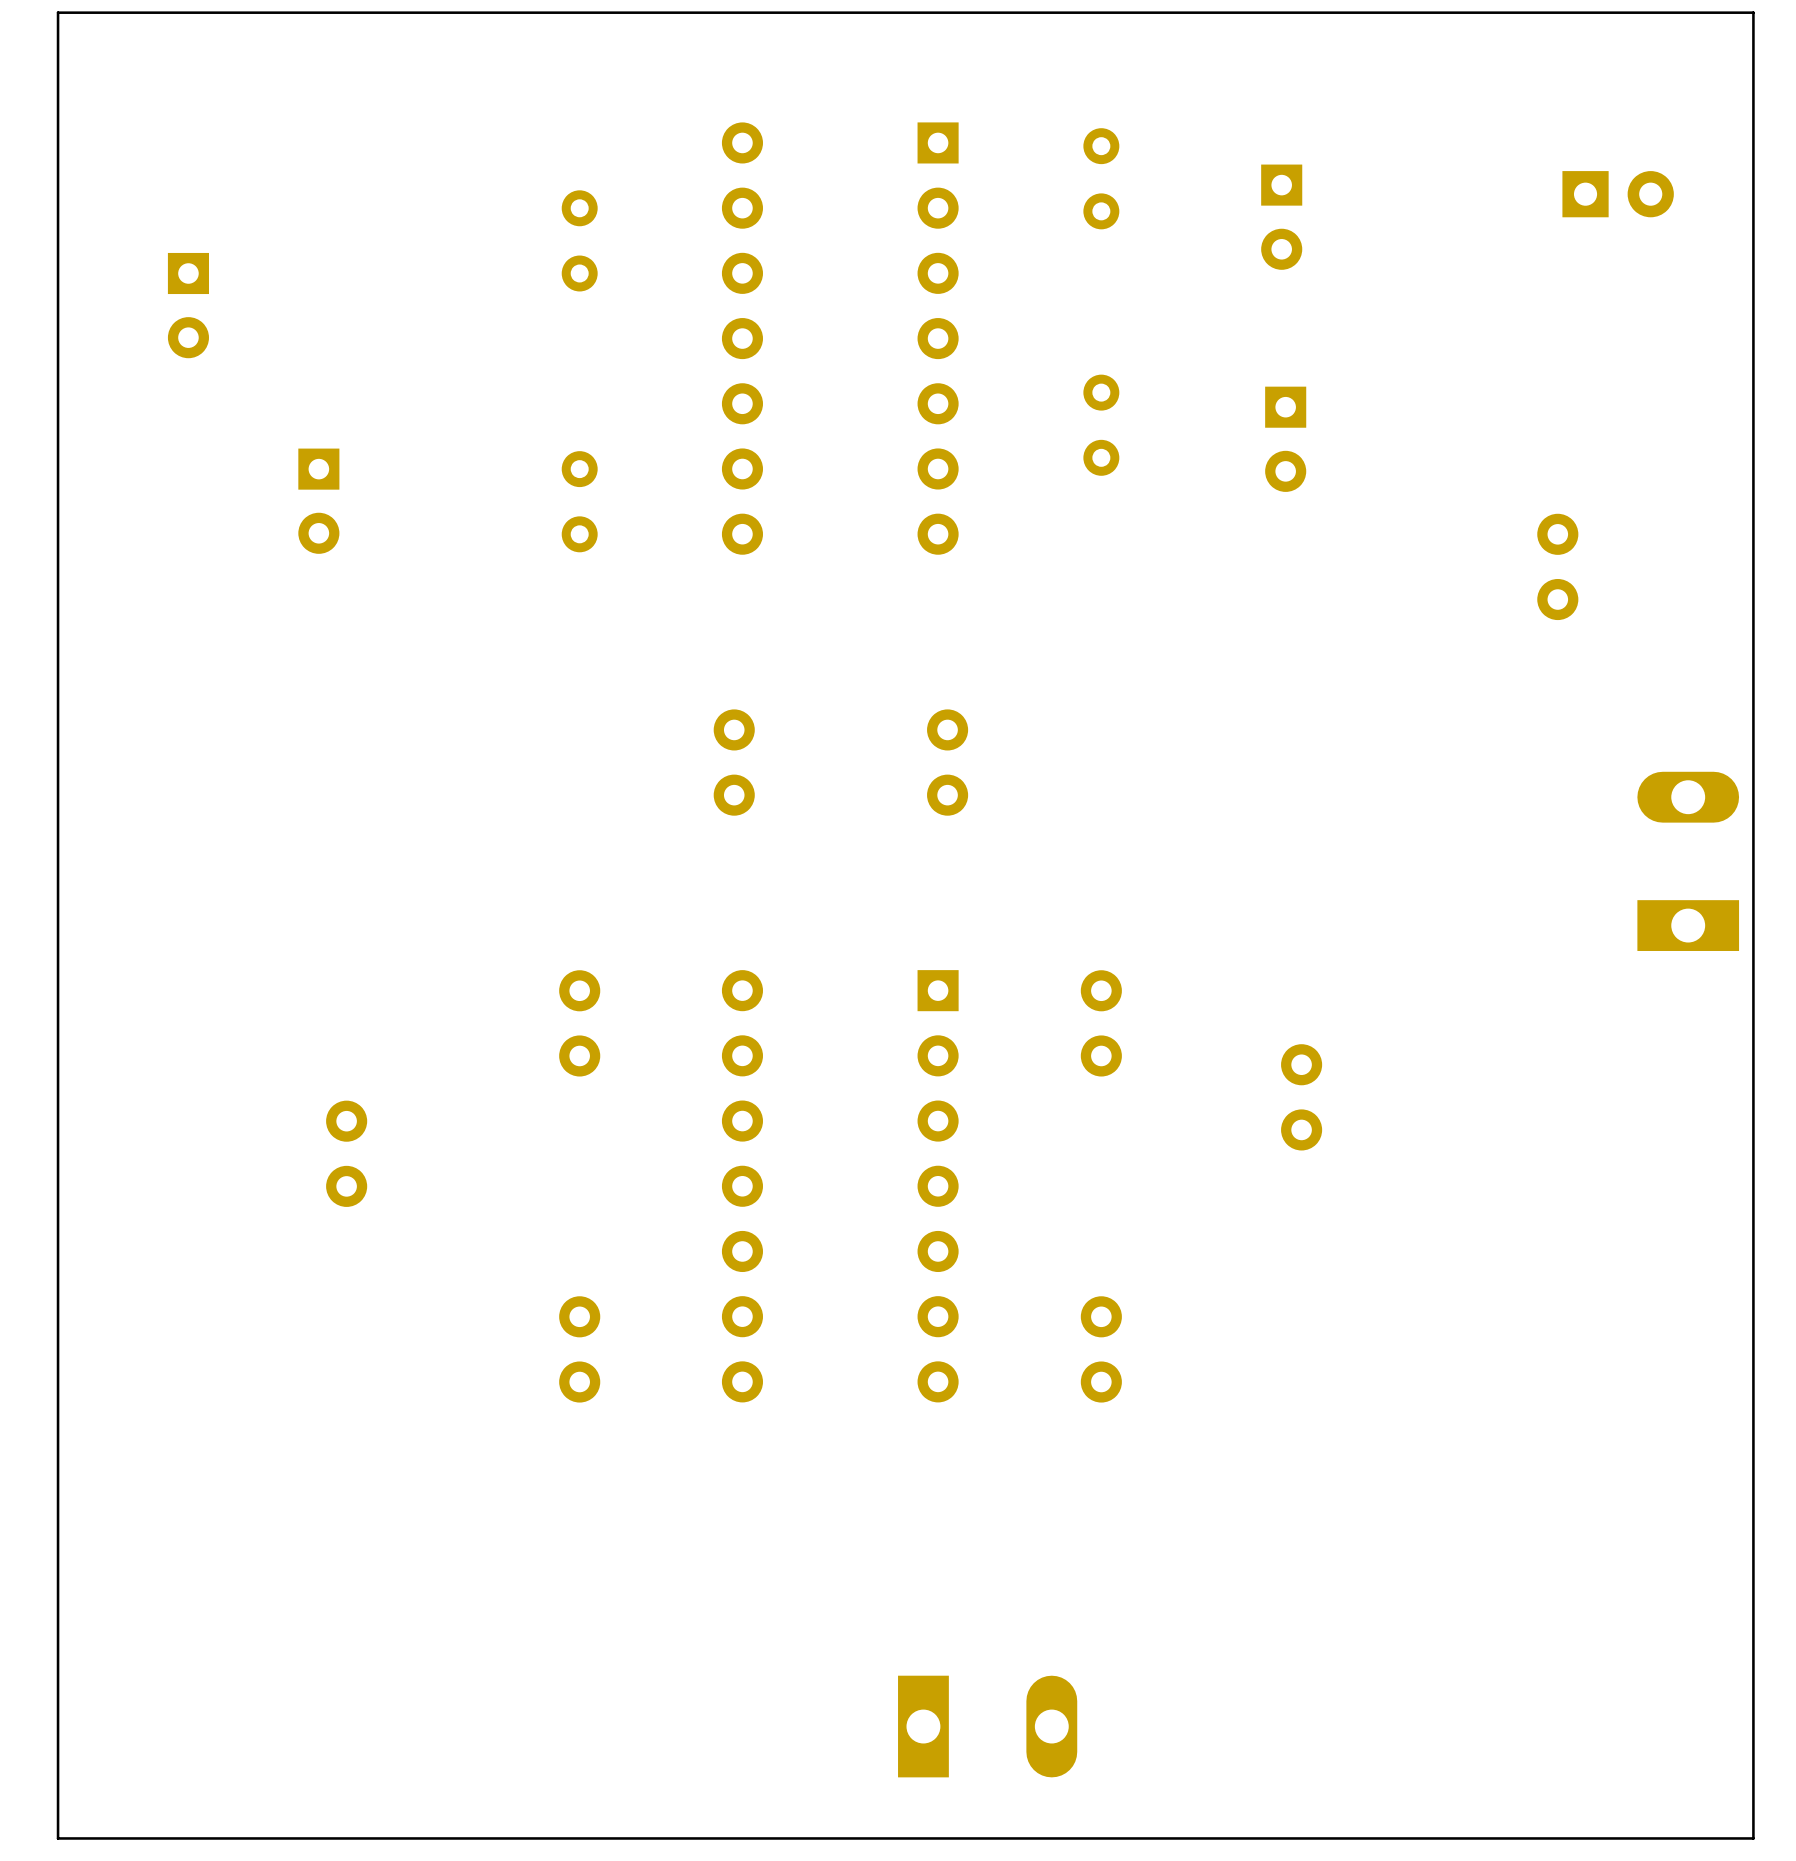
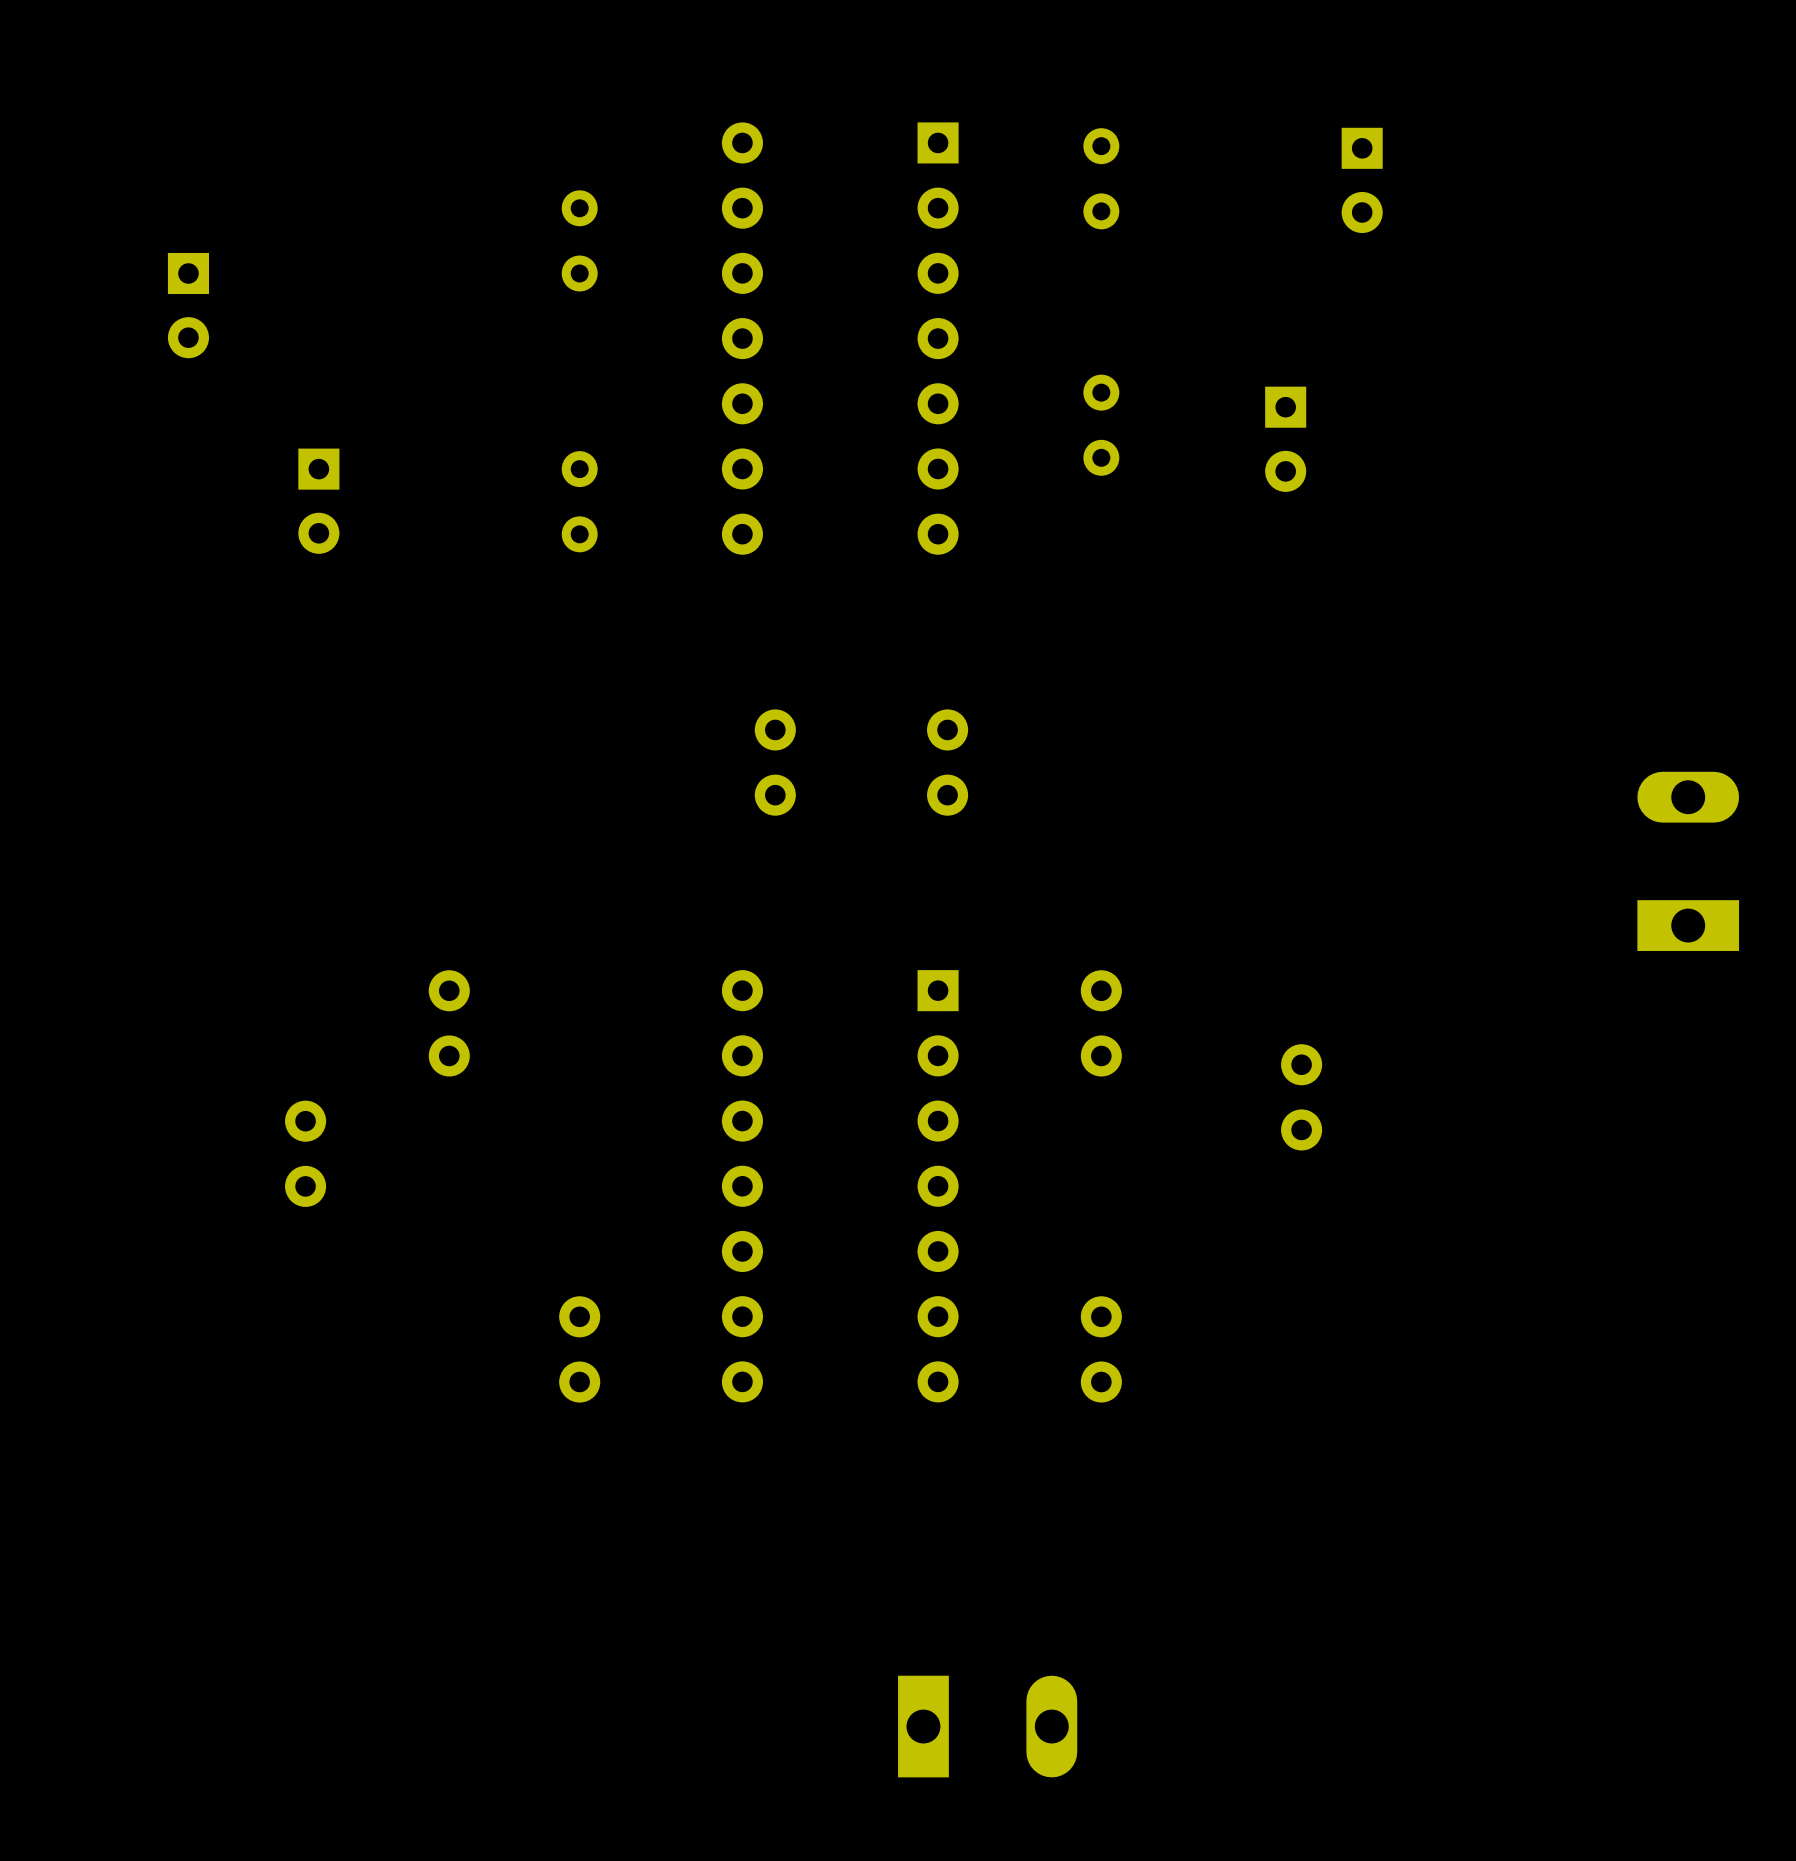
board edge: (1753, 12) (58, 12) (58, 1838) (1753, 1838) (1753, 12) -> none
part: (1618, 194) -> none
part position: (1281, 217) -> (1362, 180)
part: (1557, 566) -> none
part position: (734, 762) -> (775, 762)
part: none -> (449, 1023)
part: (579, 1023) -> none
part position: (346, 1153) -> (305, 1153)

